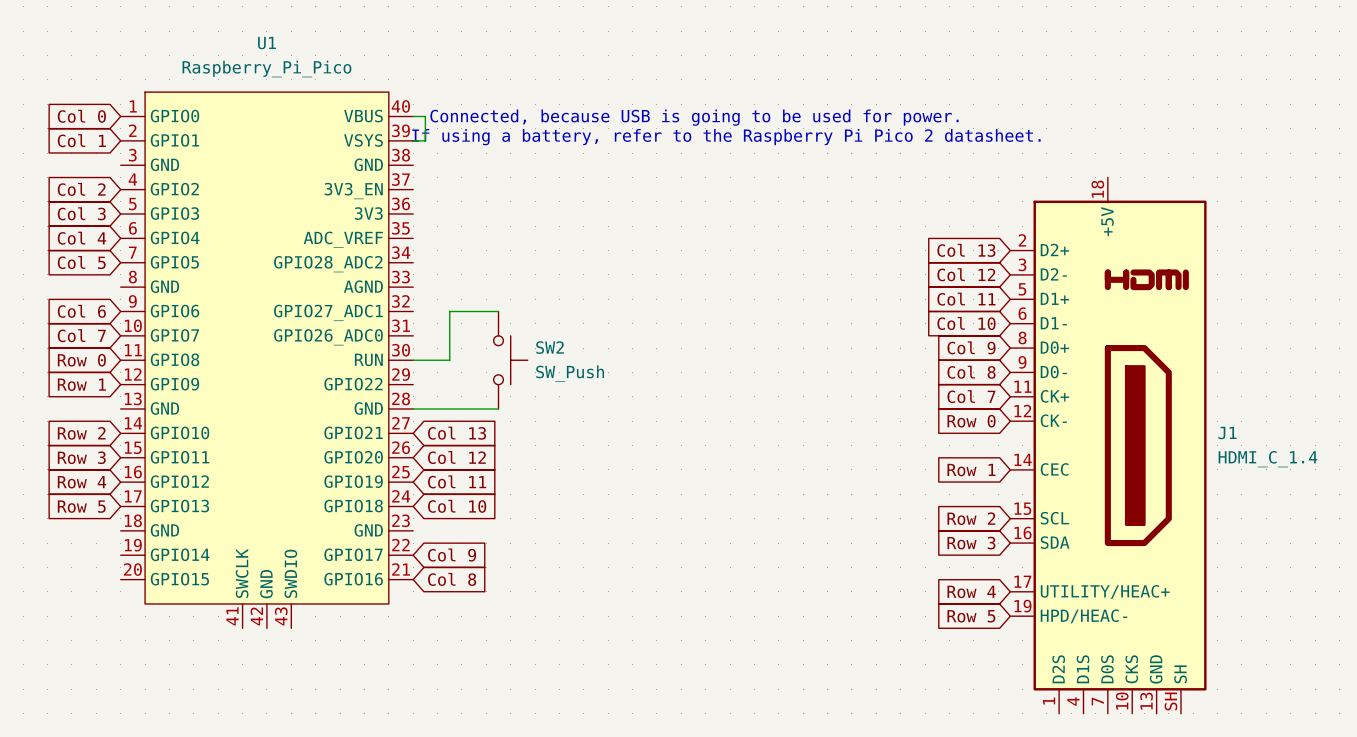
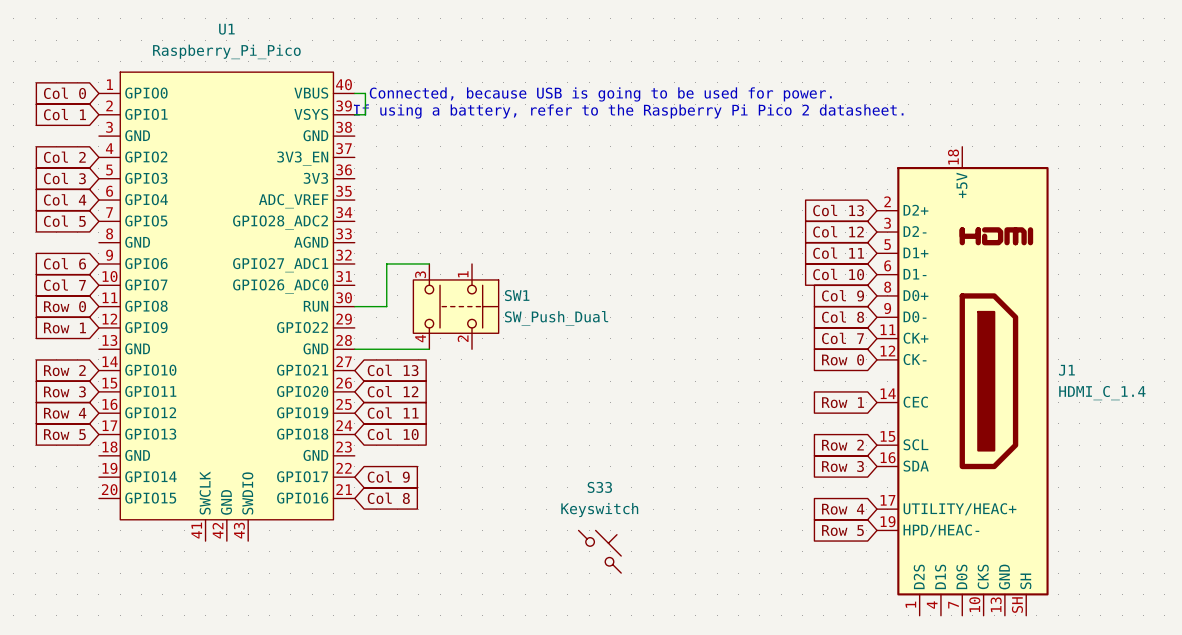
SW2: SW_Push (510, 360) -> none
SW1: none -> SW_Push_Dual (456, 306)
S33: none -> Keyswitch (599, 551)

